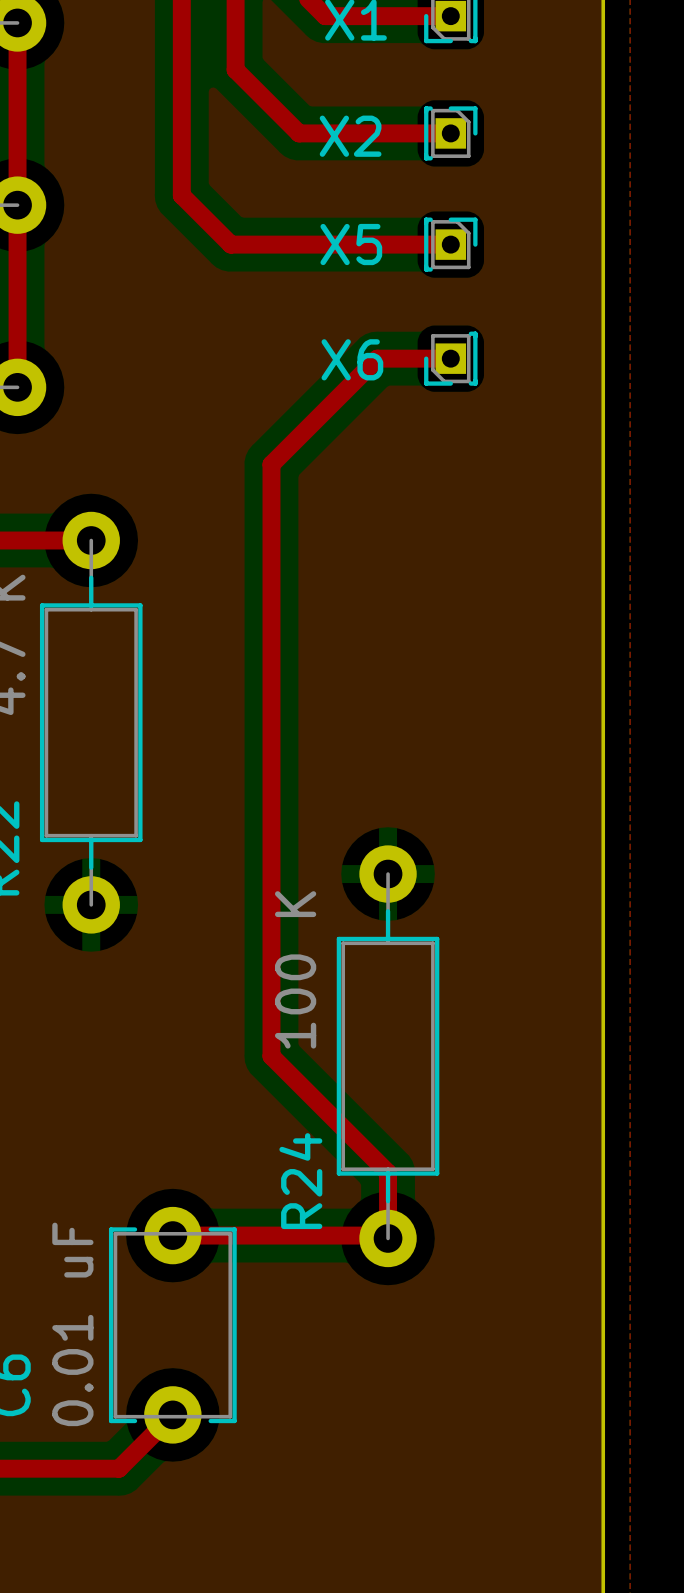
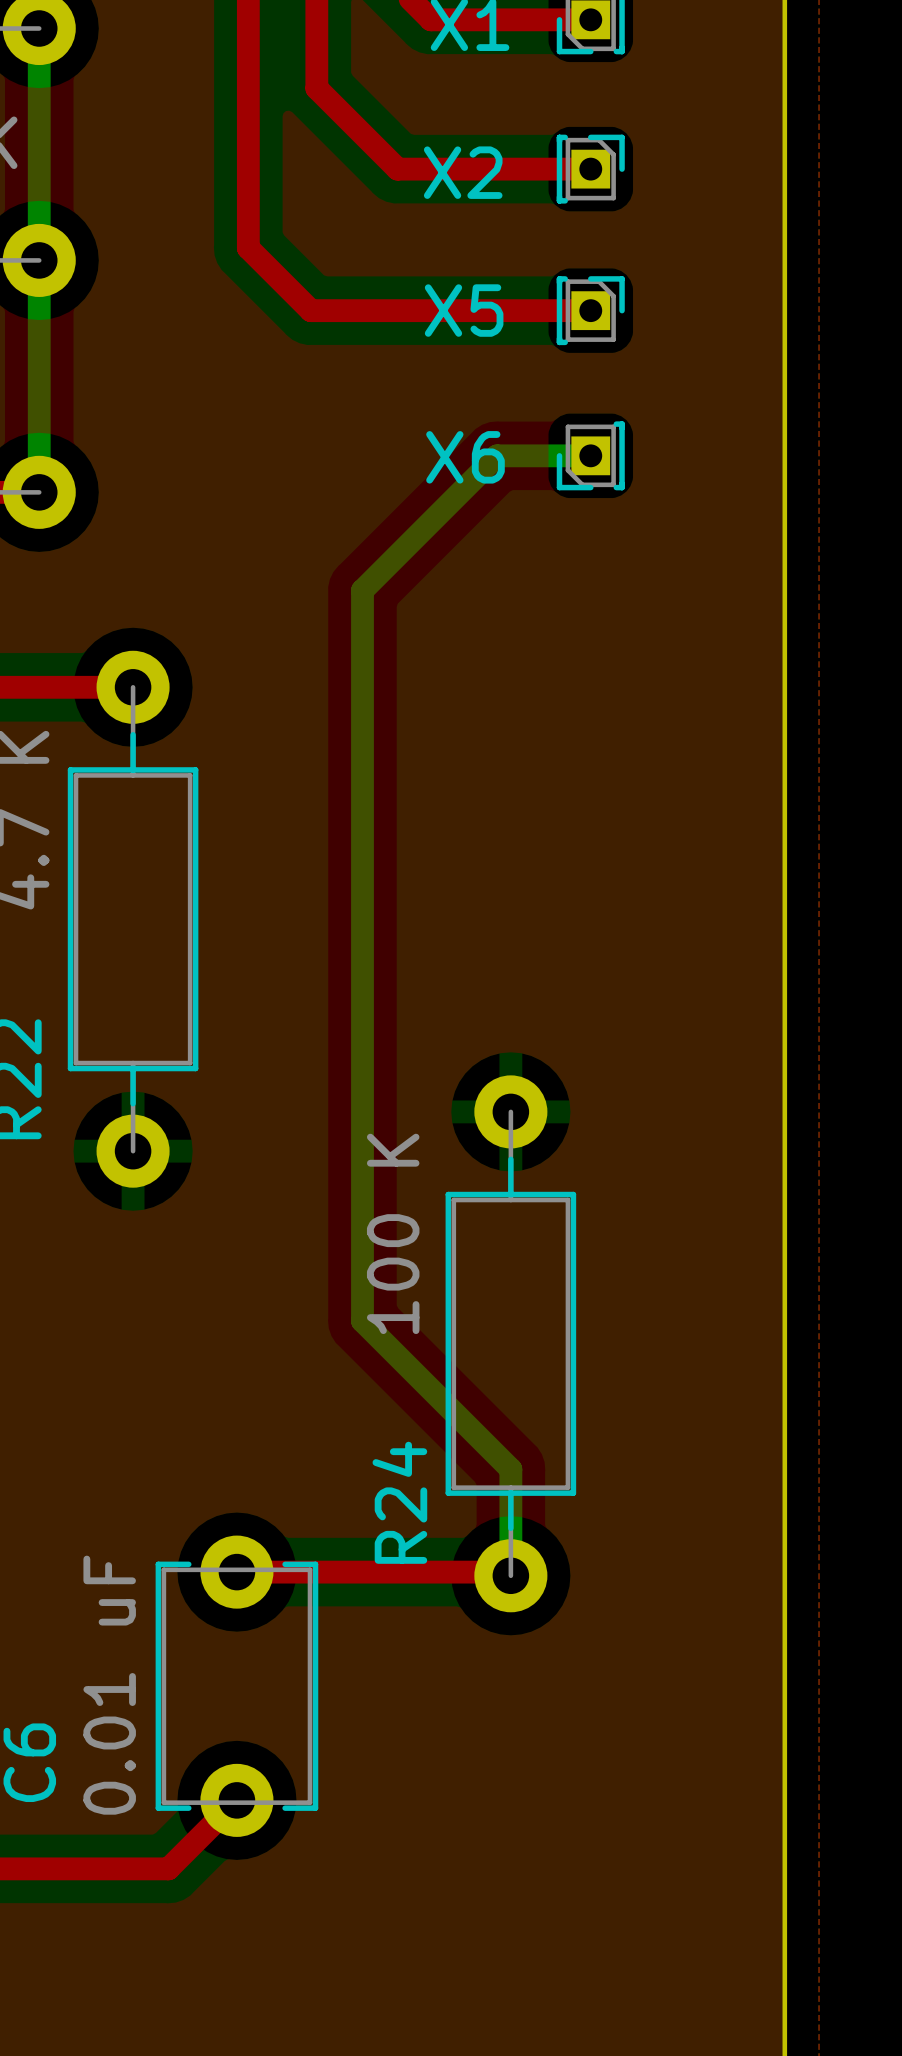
top track: (17, 22) (17, 387) -> none
bottom track: none -> (39, 28) (39, 492)
top track: (450, 358) (377, 358) (271, 464) (271, 1056) (388, 1172) (388, 1238) -> none
bottom track: none -> (590, 455) (497, 455) (362, 590) (362, 1321) (510, 1469) (510, 1575)

